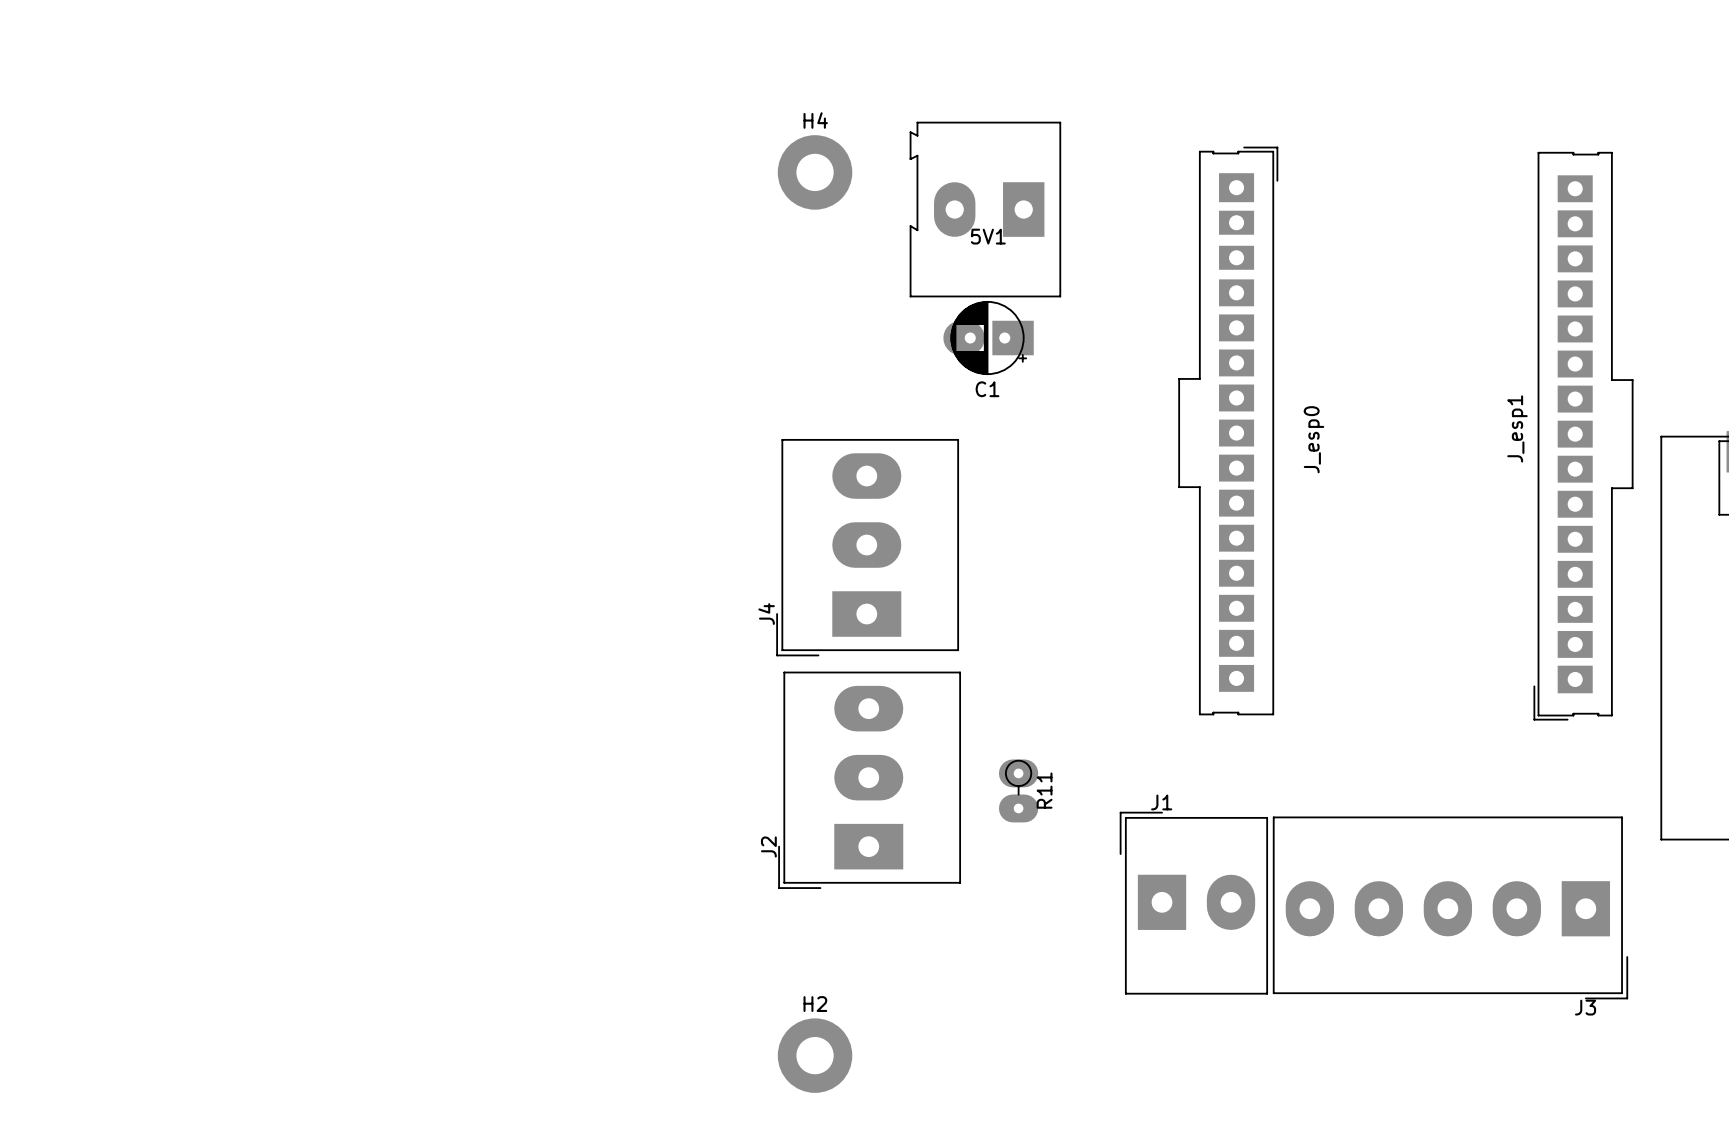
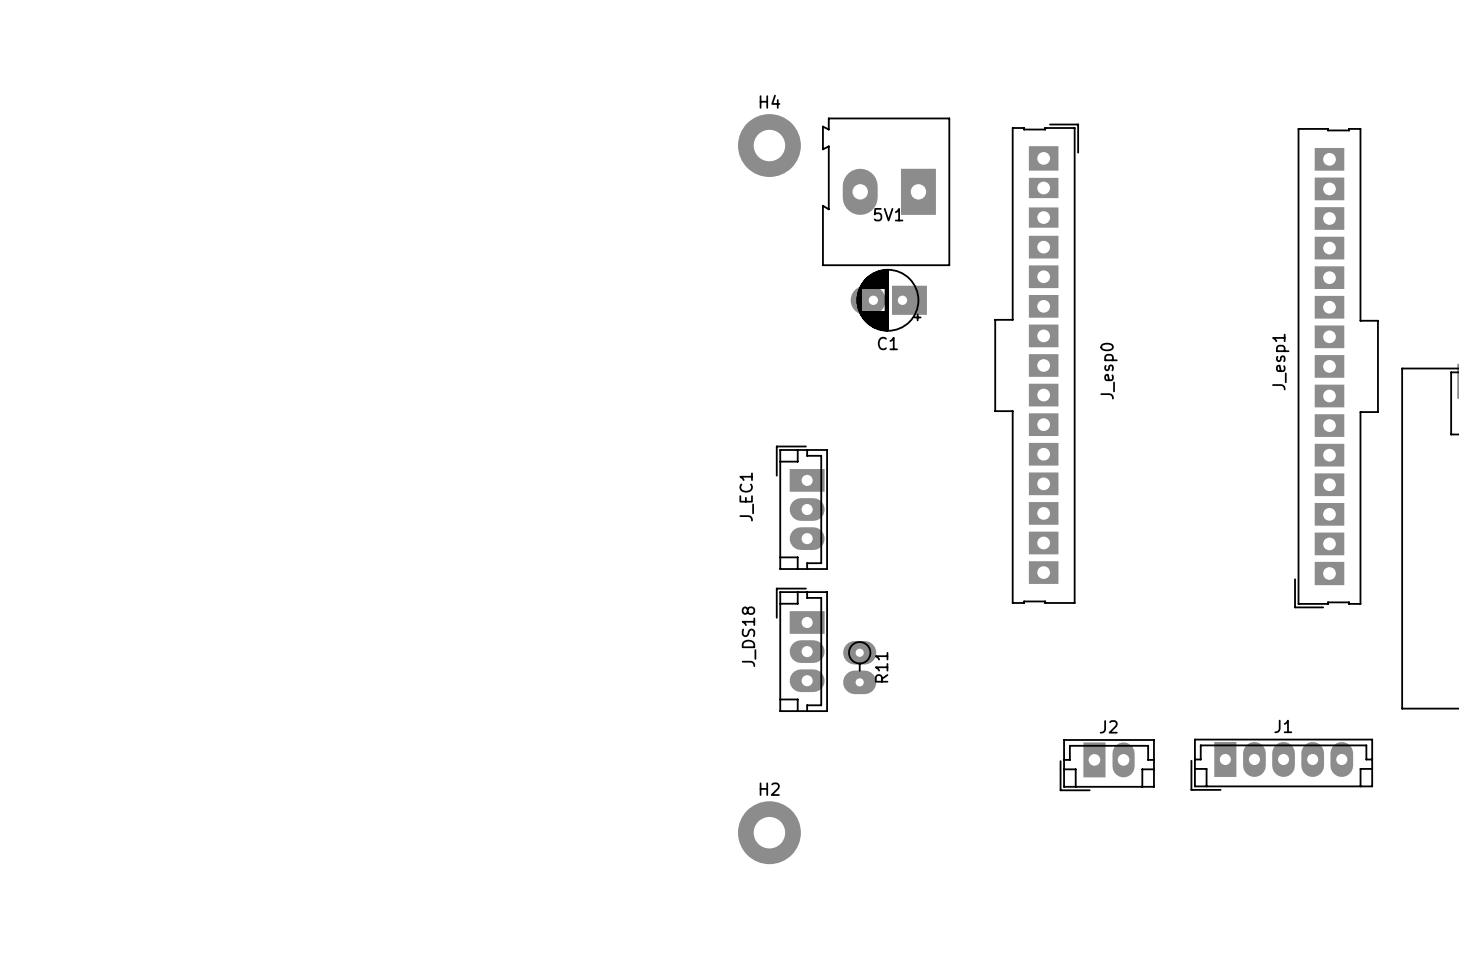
H4 position: (815, 172) -> (769, 145)
5V1 position: (985, 209) -> (886, 191)
C1 position: (988, 338) -> (888, 300)
J4: (867, 547) -> none
J_EC1: none -> (801, 507)
J2 footprint: [778, 671, 961, 889] -> [1059, 739, 1155, 792]
J_DS18: none -> (801, 649)
J1 name position: J1 (1161, 802) -> J1 (1283, 726)
J1 footprint: [1119, 811, 1268, 995] -> [1190, 738, 1373, 791]
J2 name position: J2 (768, 846) -> J2 (1108, 726)
J3: (1450, 907) -> none
H2 position: (815, 1055) -> (769, 832)

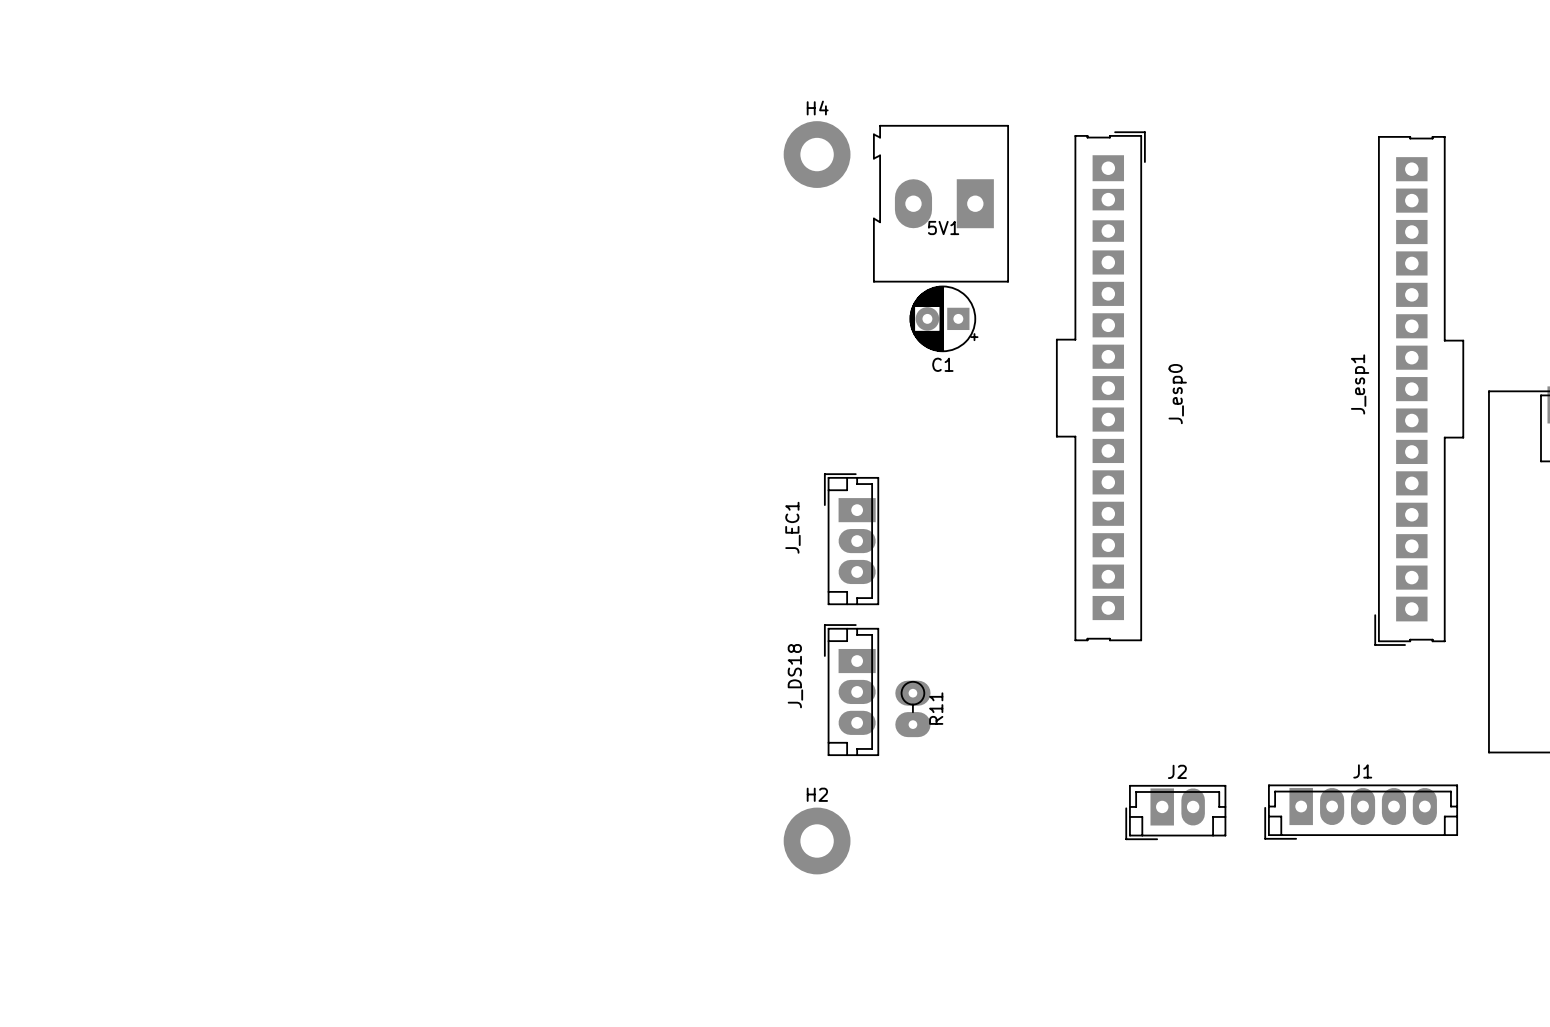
C1 footprint: [850, 269, 927, 332] -> [909, 285, 979, 353]
H2 position: (769, 832) -> (817, 840)

